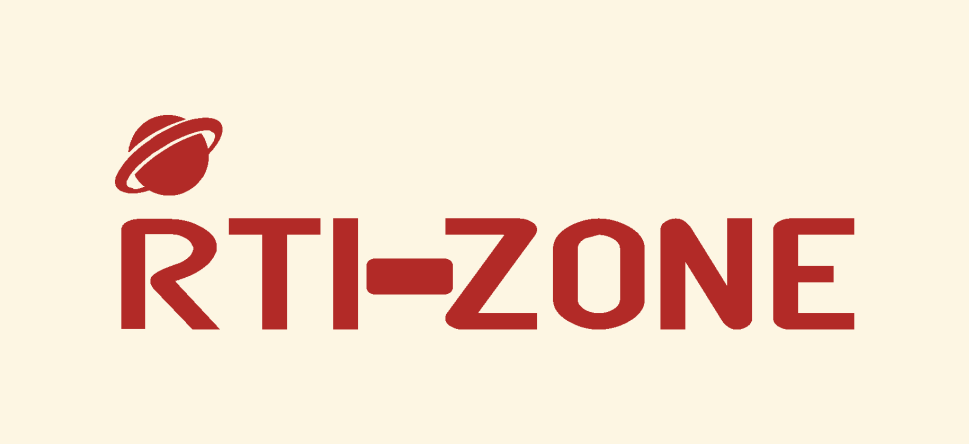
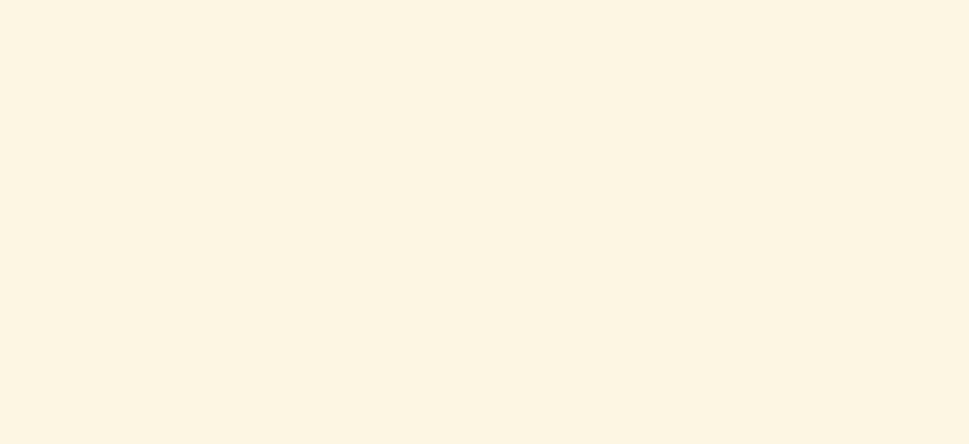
part: (484, 222) -> none

